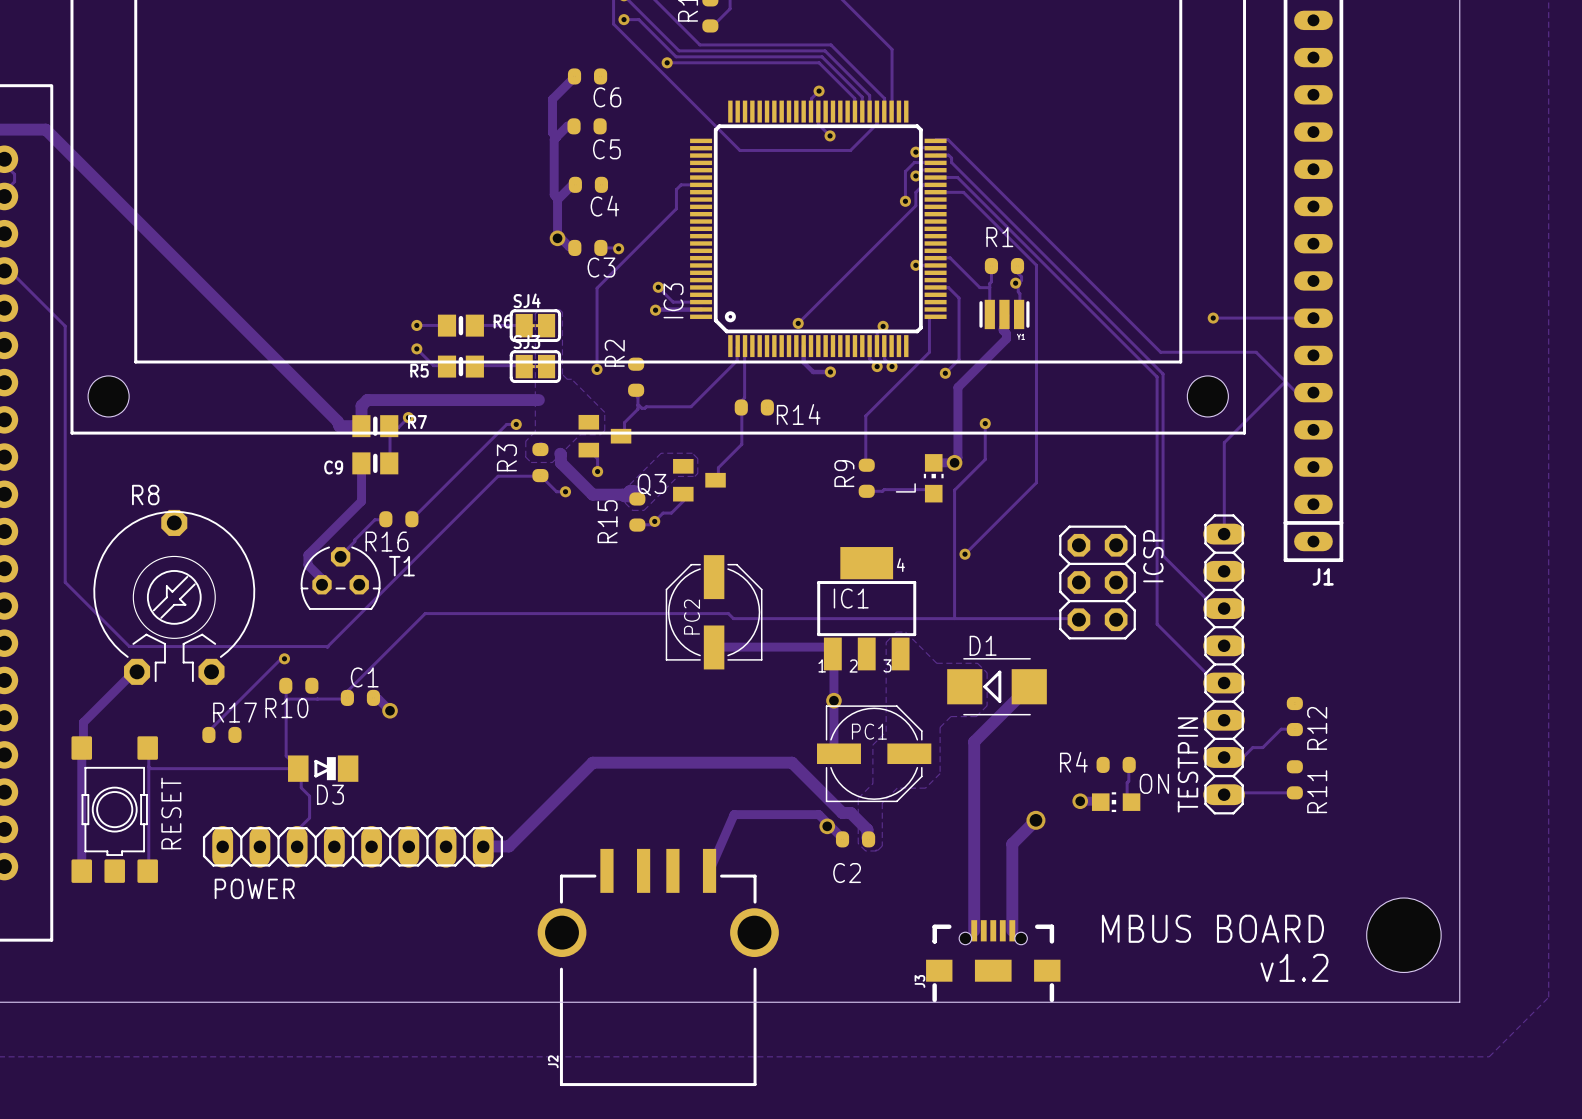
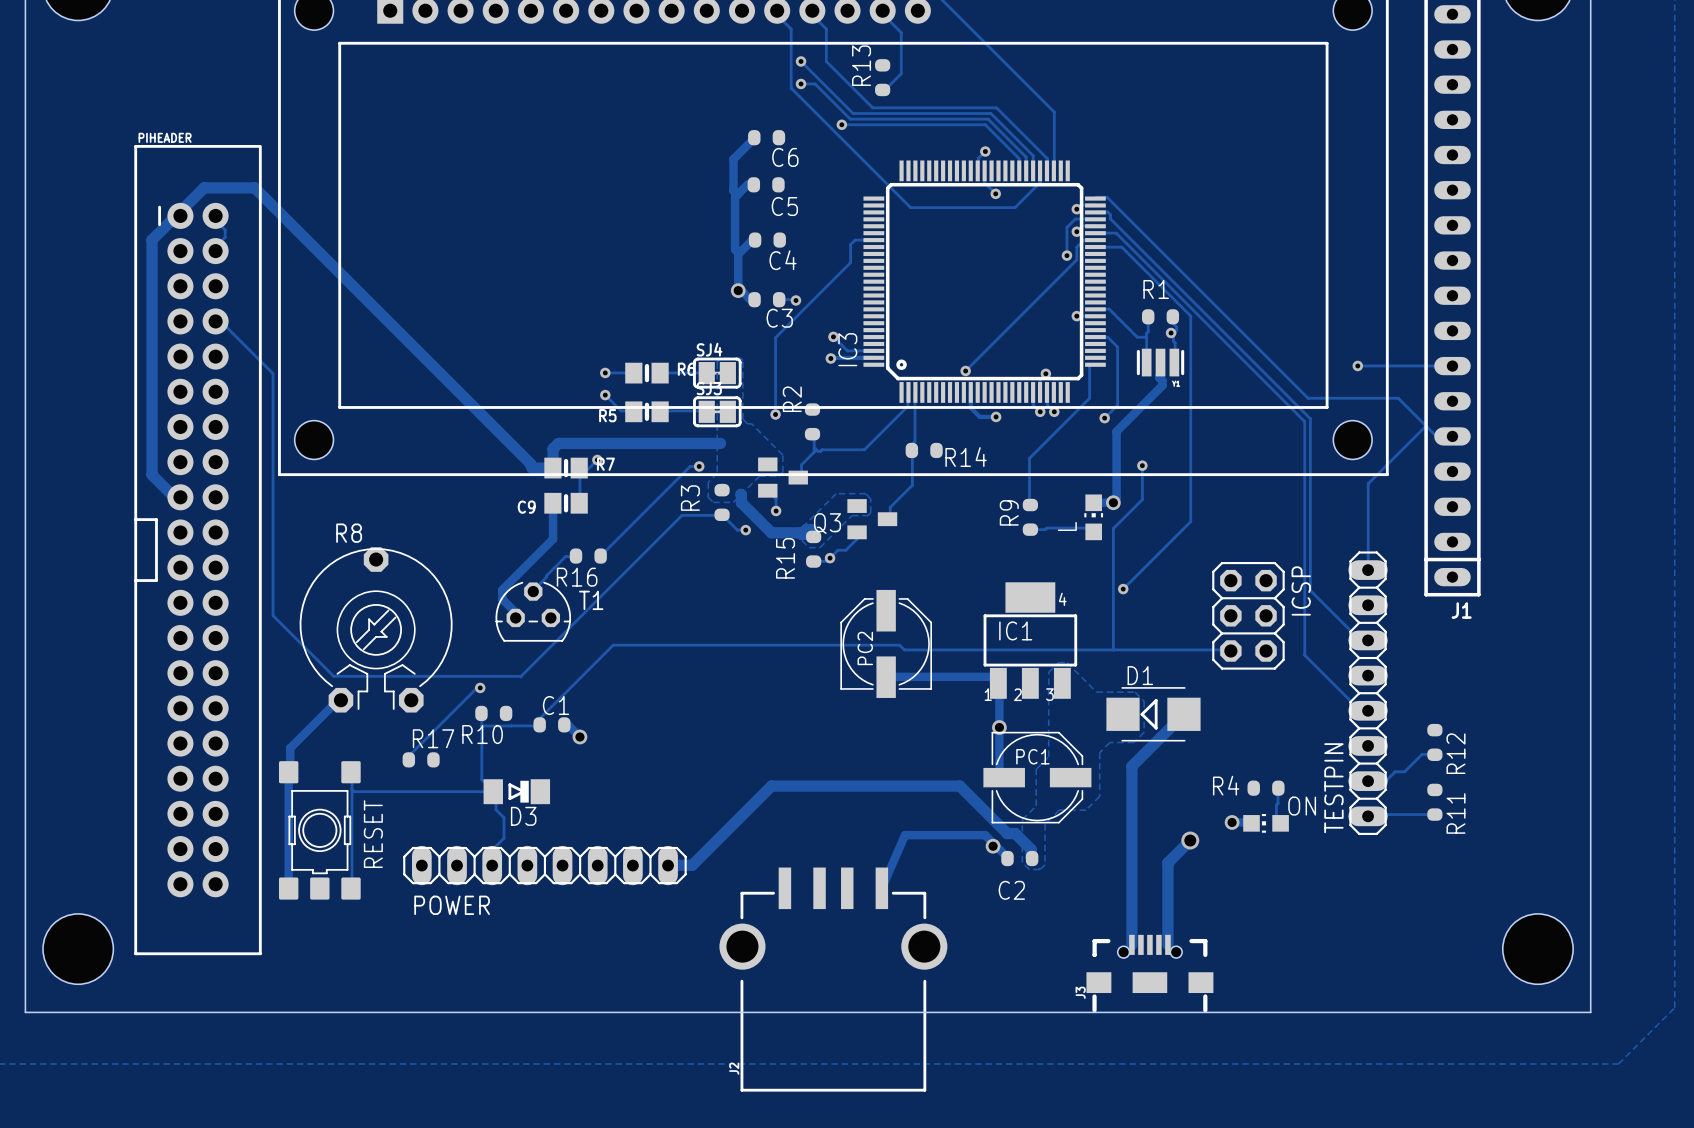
text: MBUS BOARD (1212, 928) -> none
text: v1.2 (1294, 967) -> none

